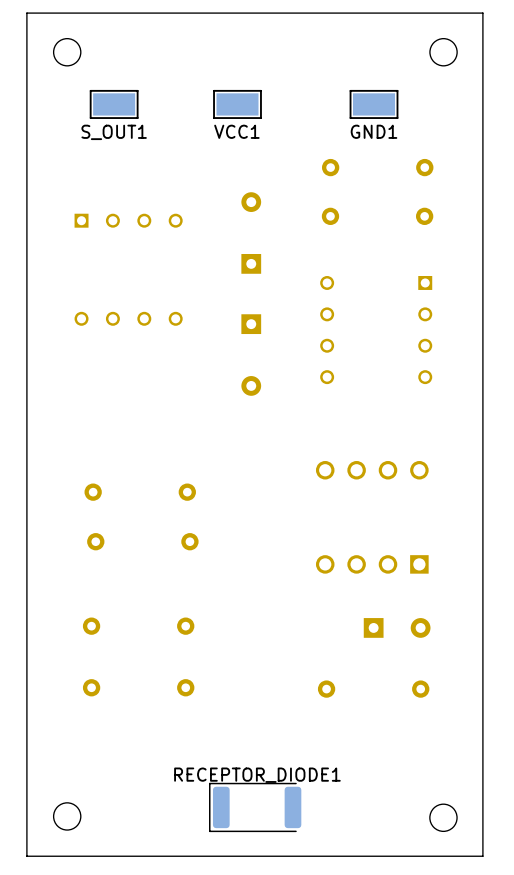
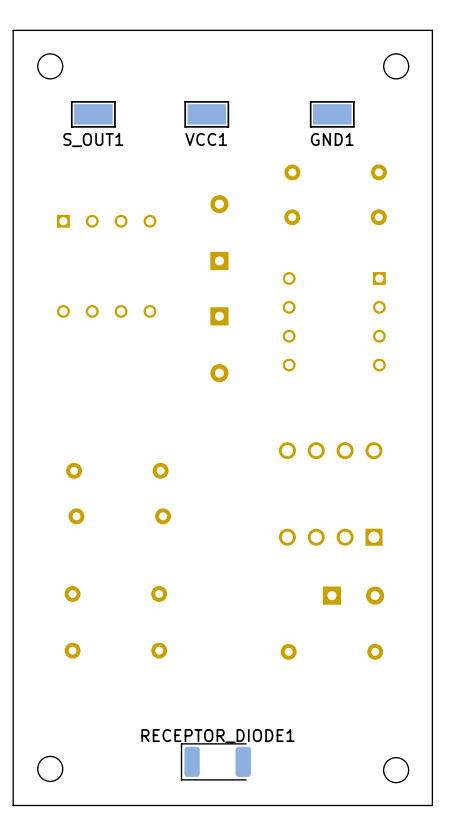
RECEPTOR_DIODE1 footprint: [209, 782, 302, 833] -> [180, 743, 251, 781]

